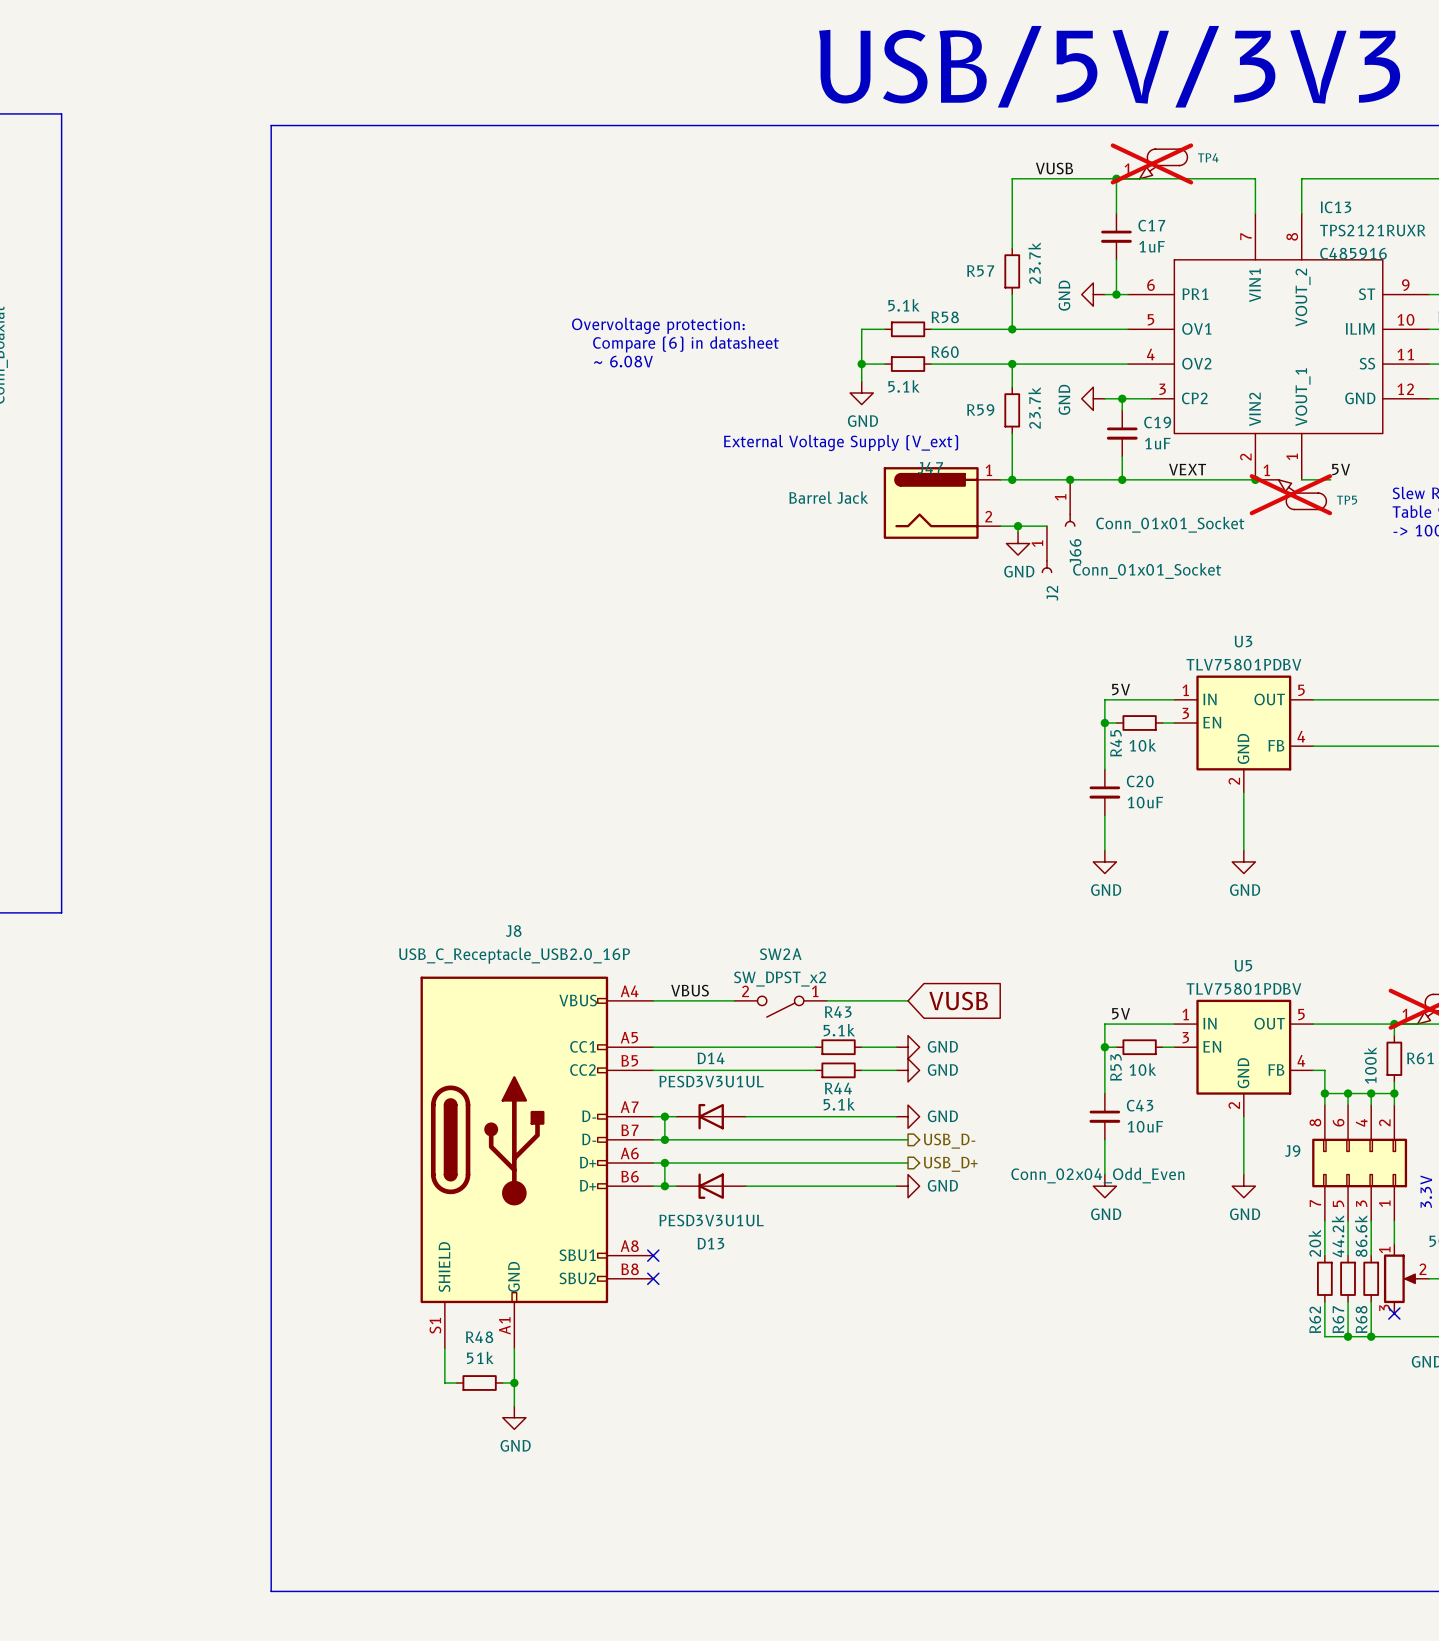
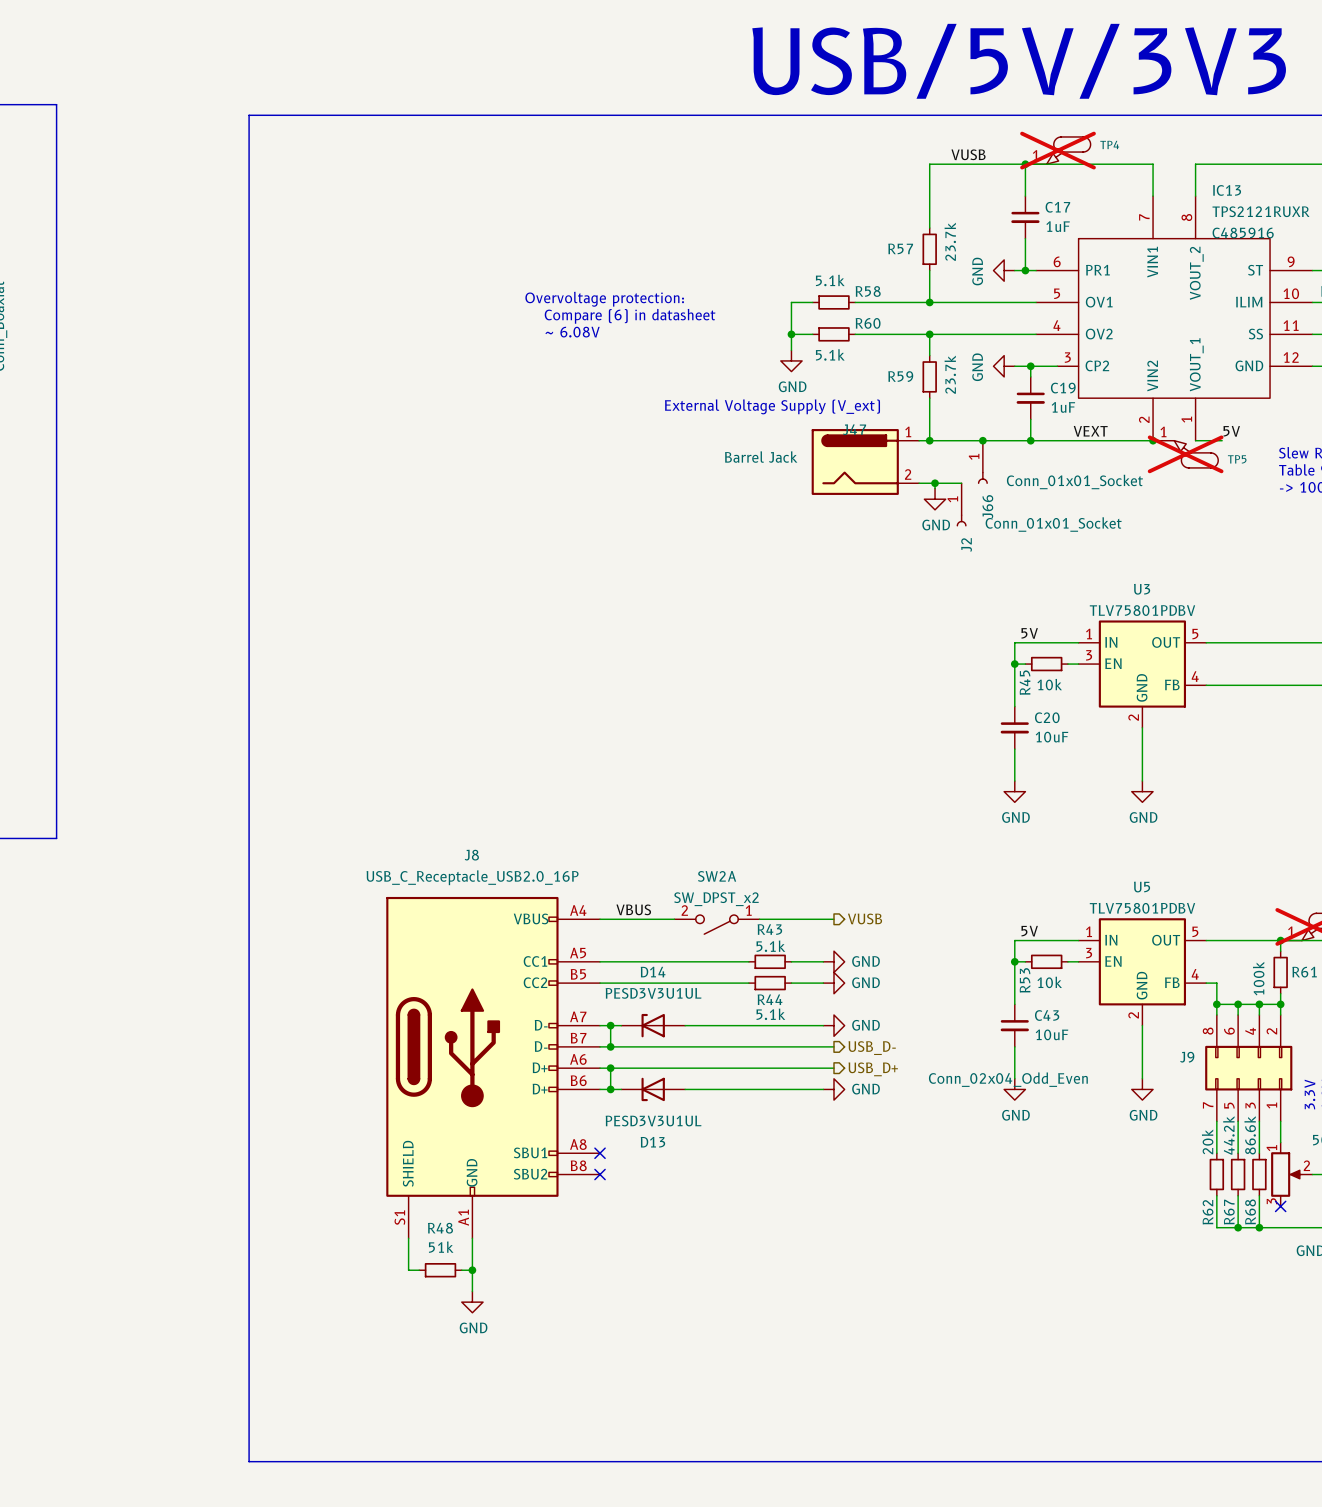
hierarchical label: none -> VUSB (865, 918)
global label: VUSB (958, 1001) -> none

